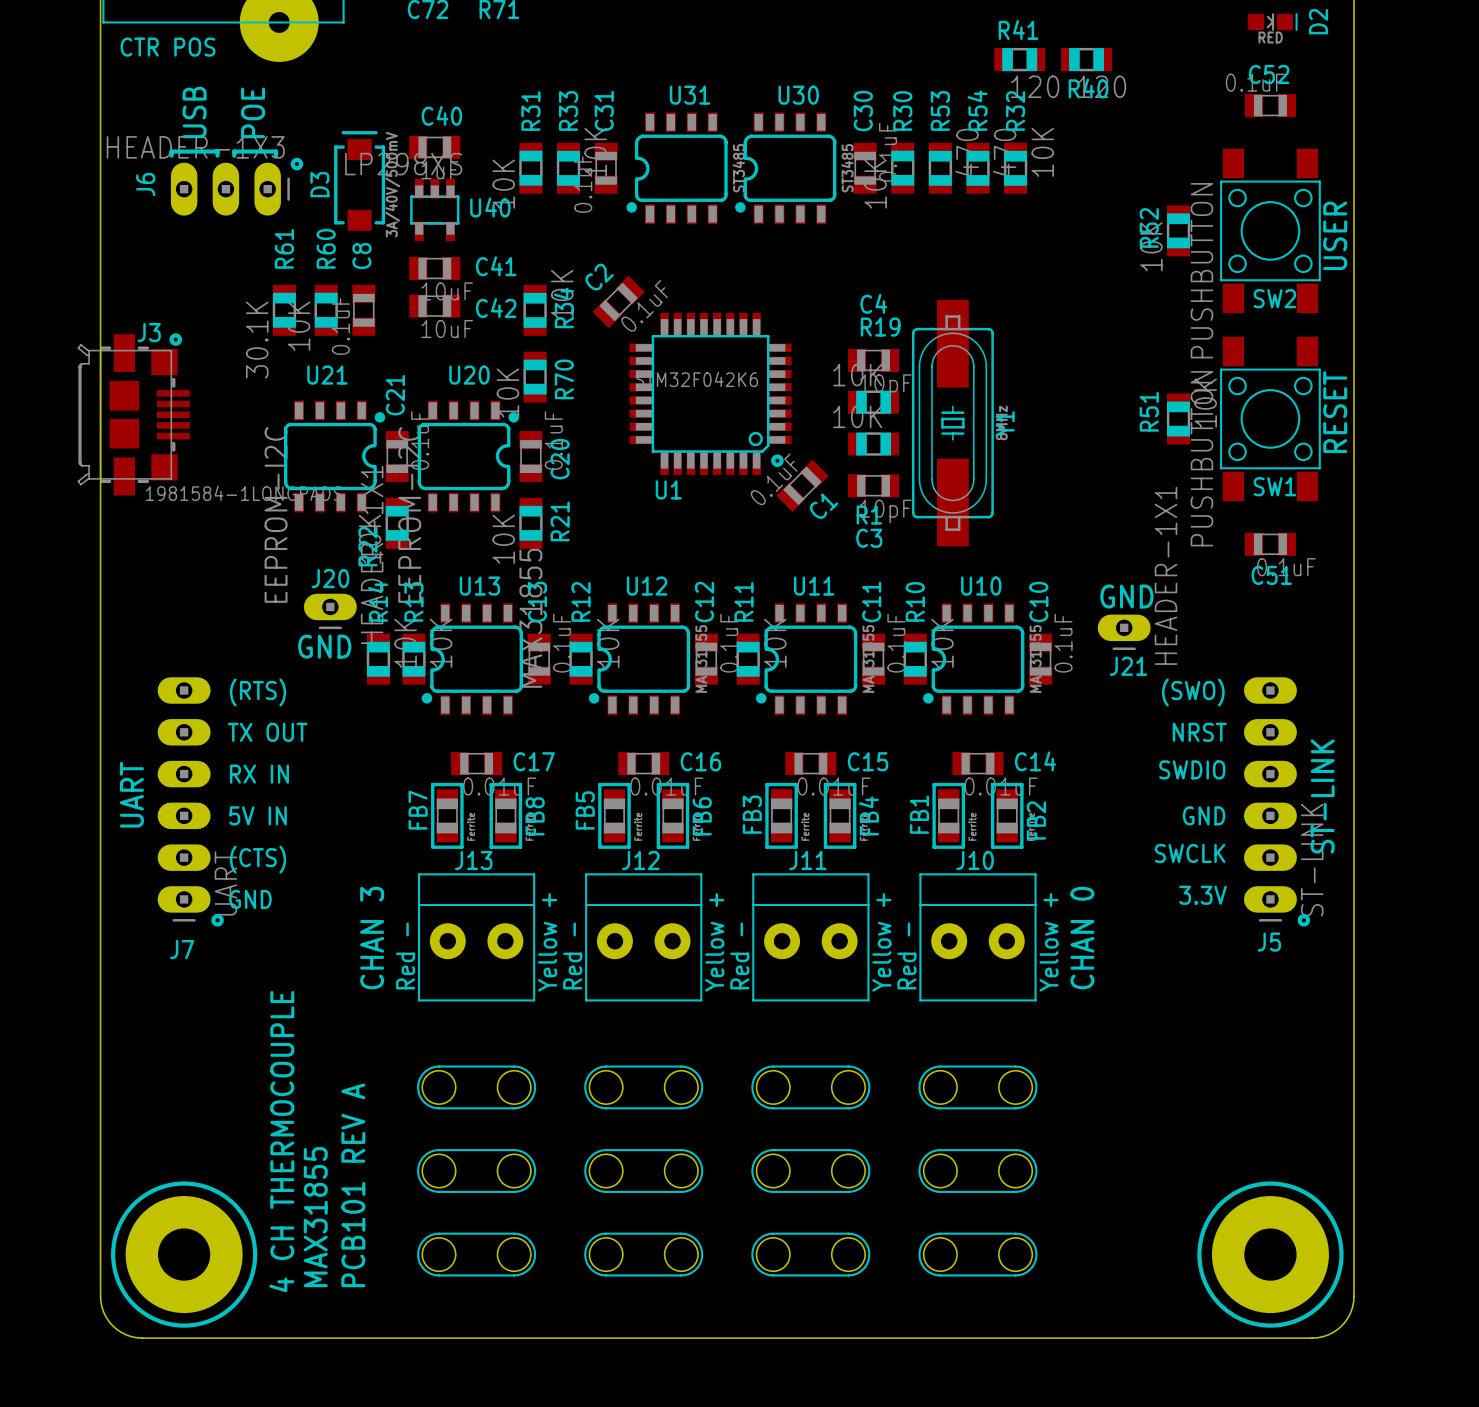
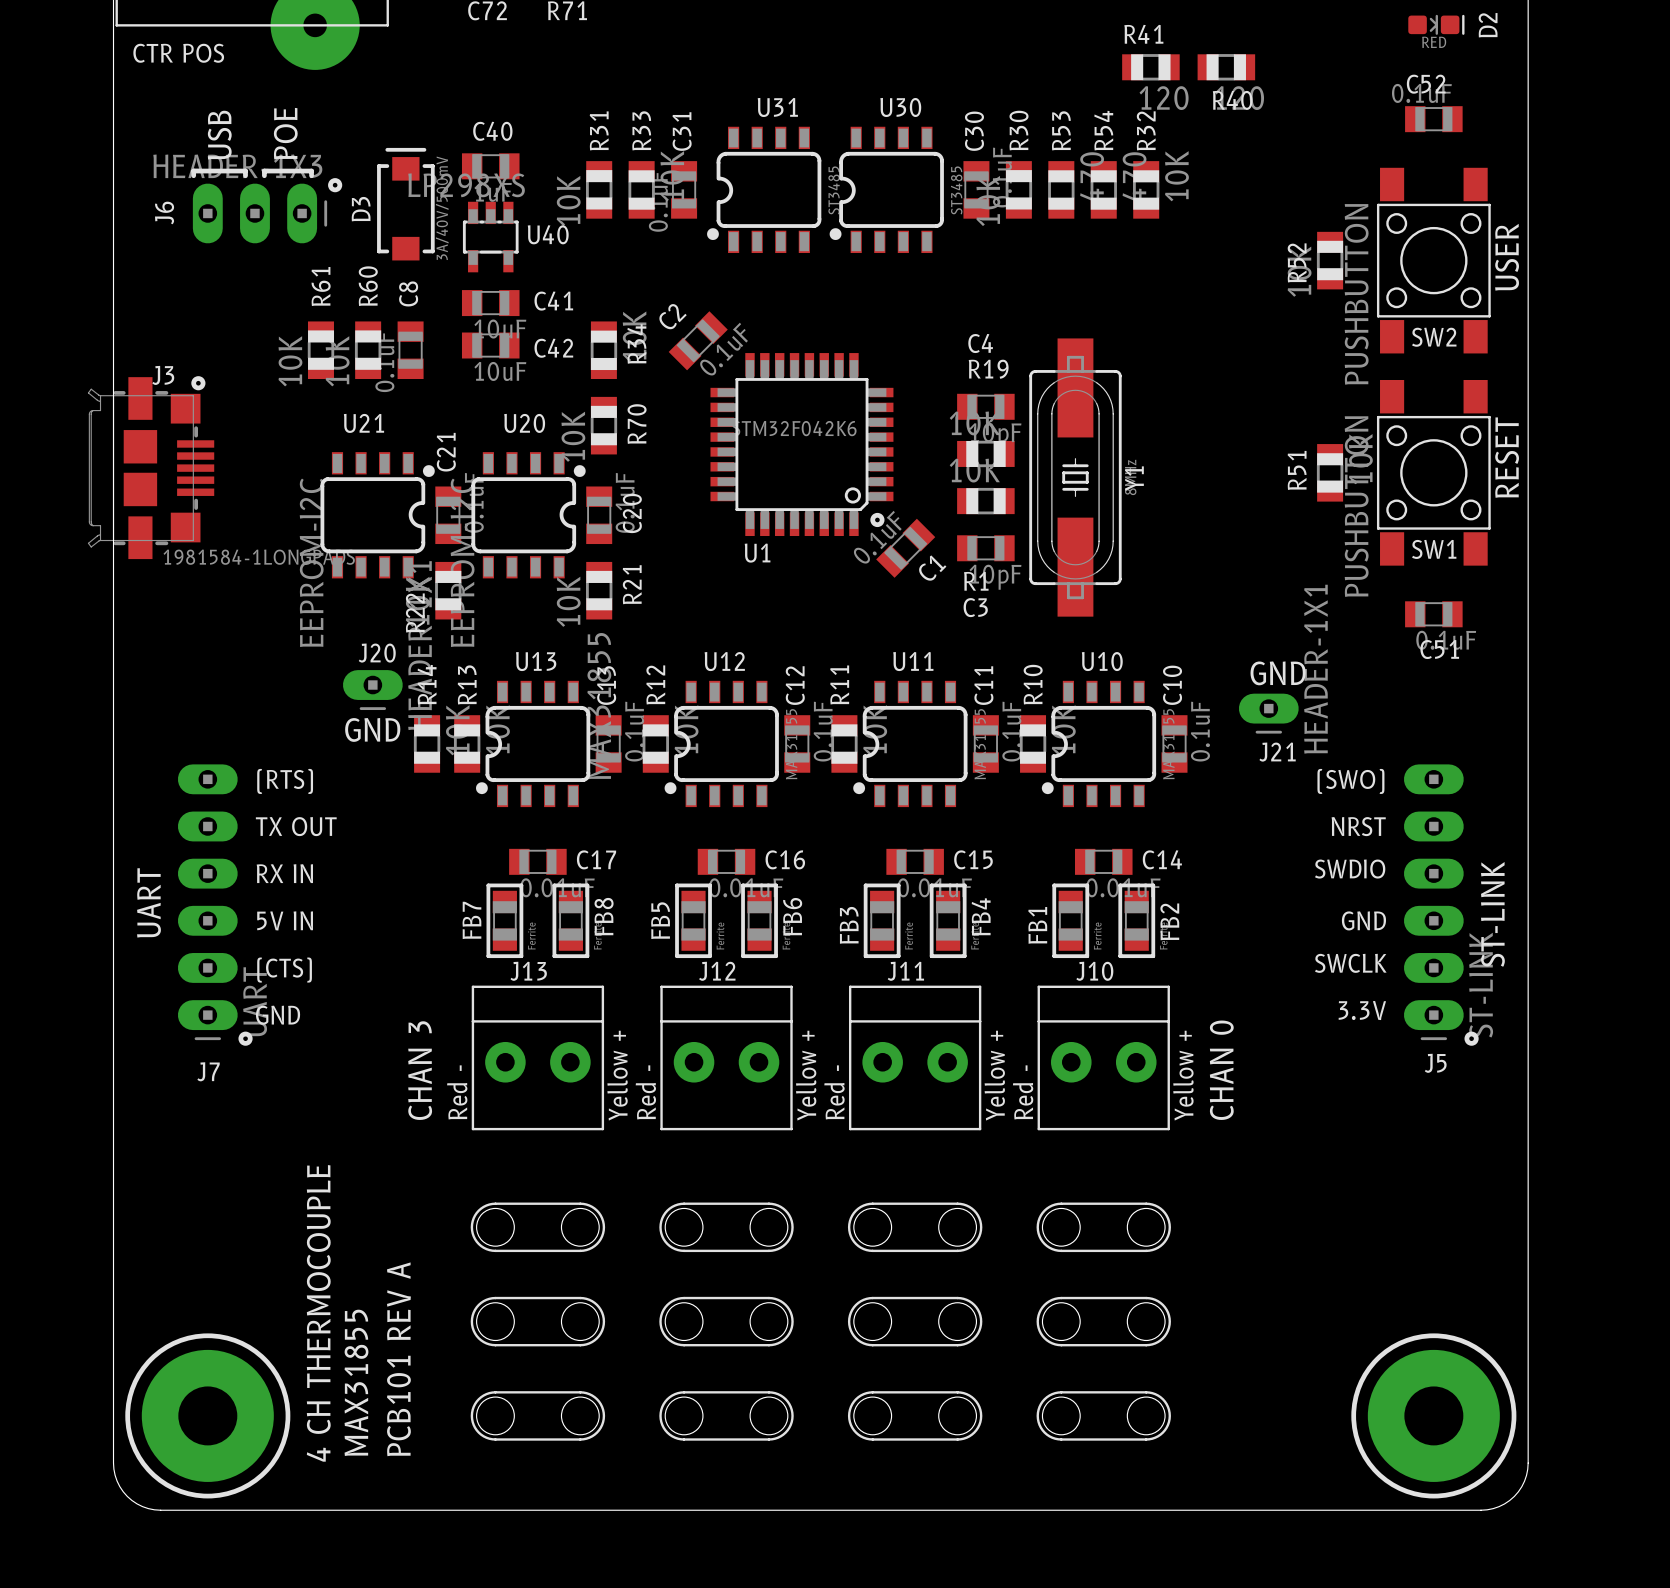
R61 value: 30.1K (257, 340) -> 10K (290, 361)

